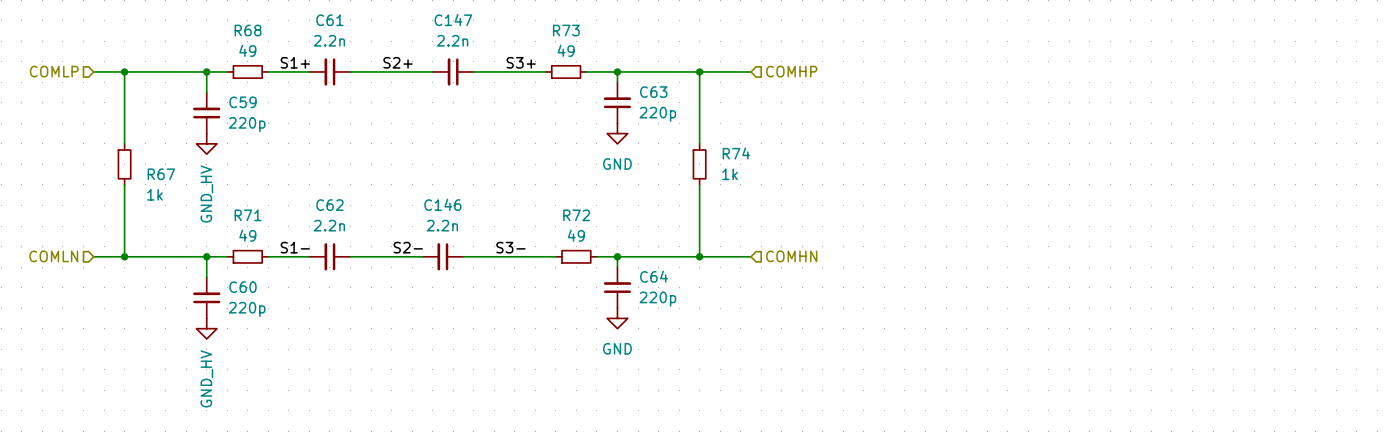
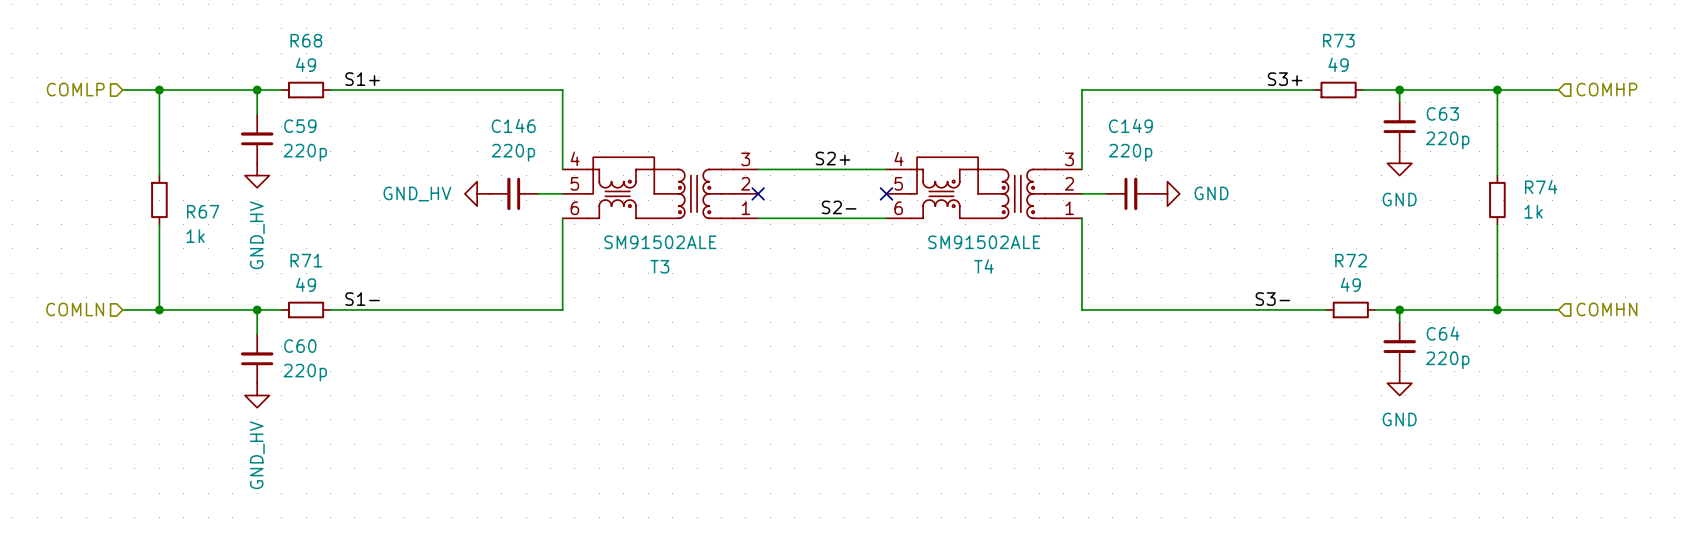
label: S2+ (398, 62) -> none
label: S3+ (521, 62) -> none
label: none -> S3+ (1285, 79)
C61: 2.2n (329, 71) -> none
wire: none -> (526, 90) (562, 90) (562, 169)
C147: 2.2n (453, 71) -> none
wire: (473, 71) (545, 71) -> none
R73 position: (566, 71) -> (1338, 90)
wire: (586, 71) (750, 71) -> none
wire: (617, 71) (617, 82) -> none
junction: (617, 71) -> none
wire: (699, 71) (699, 143) -> none
junction: (699, 71) -> none
hierarchical label: COMHP (791, 71) -> none
wire: none -> (1314, 90) (1081, 90) (1081, 169)
wire: none -> (1363, 90) (1558, 90)
wire: none -> (1399, 90) (1399, 102)
junction: none -> (1399, 90)
wire: none -> (1497, 90) (1497, 175)
junction: none -> (1497, 90)
hierarchical label: none -> COMHP (1606, 89)
C63 position: (617, 102) -> (1399, 126)
label: none -> S2+ (833, 158)
power symbol: GND (617, 133) -> none
power symbol: none -> GND (1399, 163)
wire: none -> (758, 169) (886, 169)
T3: none -> SM91502ALE (660, 187)
T4: none -> SM91502ALE (984, 187)
power symbol: none -> GND_HV (477, 193)
wire: none -> (538, 193) (562, 193)
no-connect mark: none -> (758, 193)
no-connect mark: none -> (886, 193)
wire: none -> (1081, 193) (1106, 193)
C149: none -> 220p (1130, 193)
power symbol: none -> GND (1167, 193)
R74 position: (699, 164) -> (1497, 200)
label: none -> S2- (839, 207)
wire: none -> (562, 218) (562, 309) (513, 309)
wire: none -> (758, 218) (886, 218)
wire: none -> (1081, 218) (1081, 309) (1326, 309)
wire: (699, 184) (699, 256) -> none
wire: none -> (1497, 224) (1497, 309)
C146 name position: C146 (442, 204) -> C146 (513, 125)
C146 value: 2.2n (442, 225) -> 220p (513, 152)
label: S2- (408, 247) -> none
label: S3- (510, 247) -> none
label: none -> S3- (1272, 299)
C62: 2.2n (329, 256) -> none
C146 position: (442, 256) -> (513, 193)
wire: (463, 256) (555, 256) -> none
R72 position: (576, 256) -> (1350, 309)
wire: (596, 256) (750, 256) -> none
wire: (617, 256) (617, 267) -> none
junction: (617, 256) -> none
junction: (699, 256) -> none
hierarchical label: COMHN (791, 256) -> none
wire: none -> (1375, 309) (1558, 309)
wire: none -> (1399, 309) (1399, 322)
junction: none -> (1399, 309)
junction: none -> (1497, 309)
hierarchical label: none -> COMHN (1606, 309)
C64 position: (617, 287) -> (1399, 346)
power symbol: GND (617, 318) -> none
power symbol: none -> GND (1399, 383)

